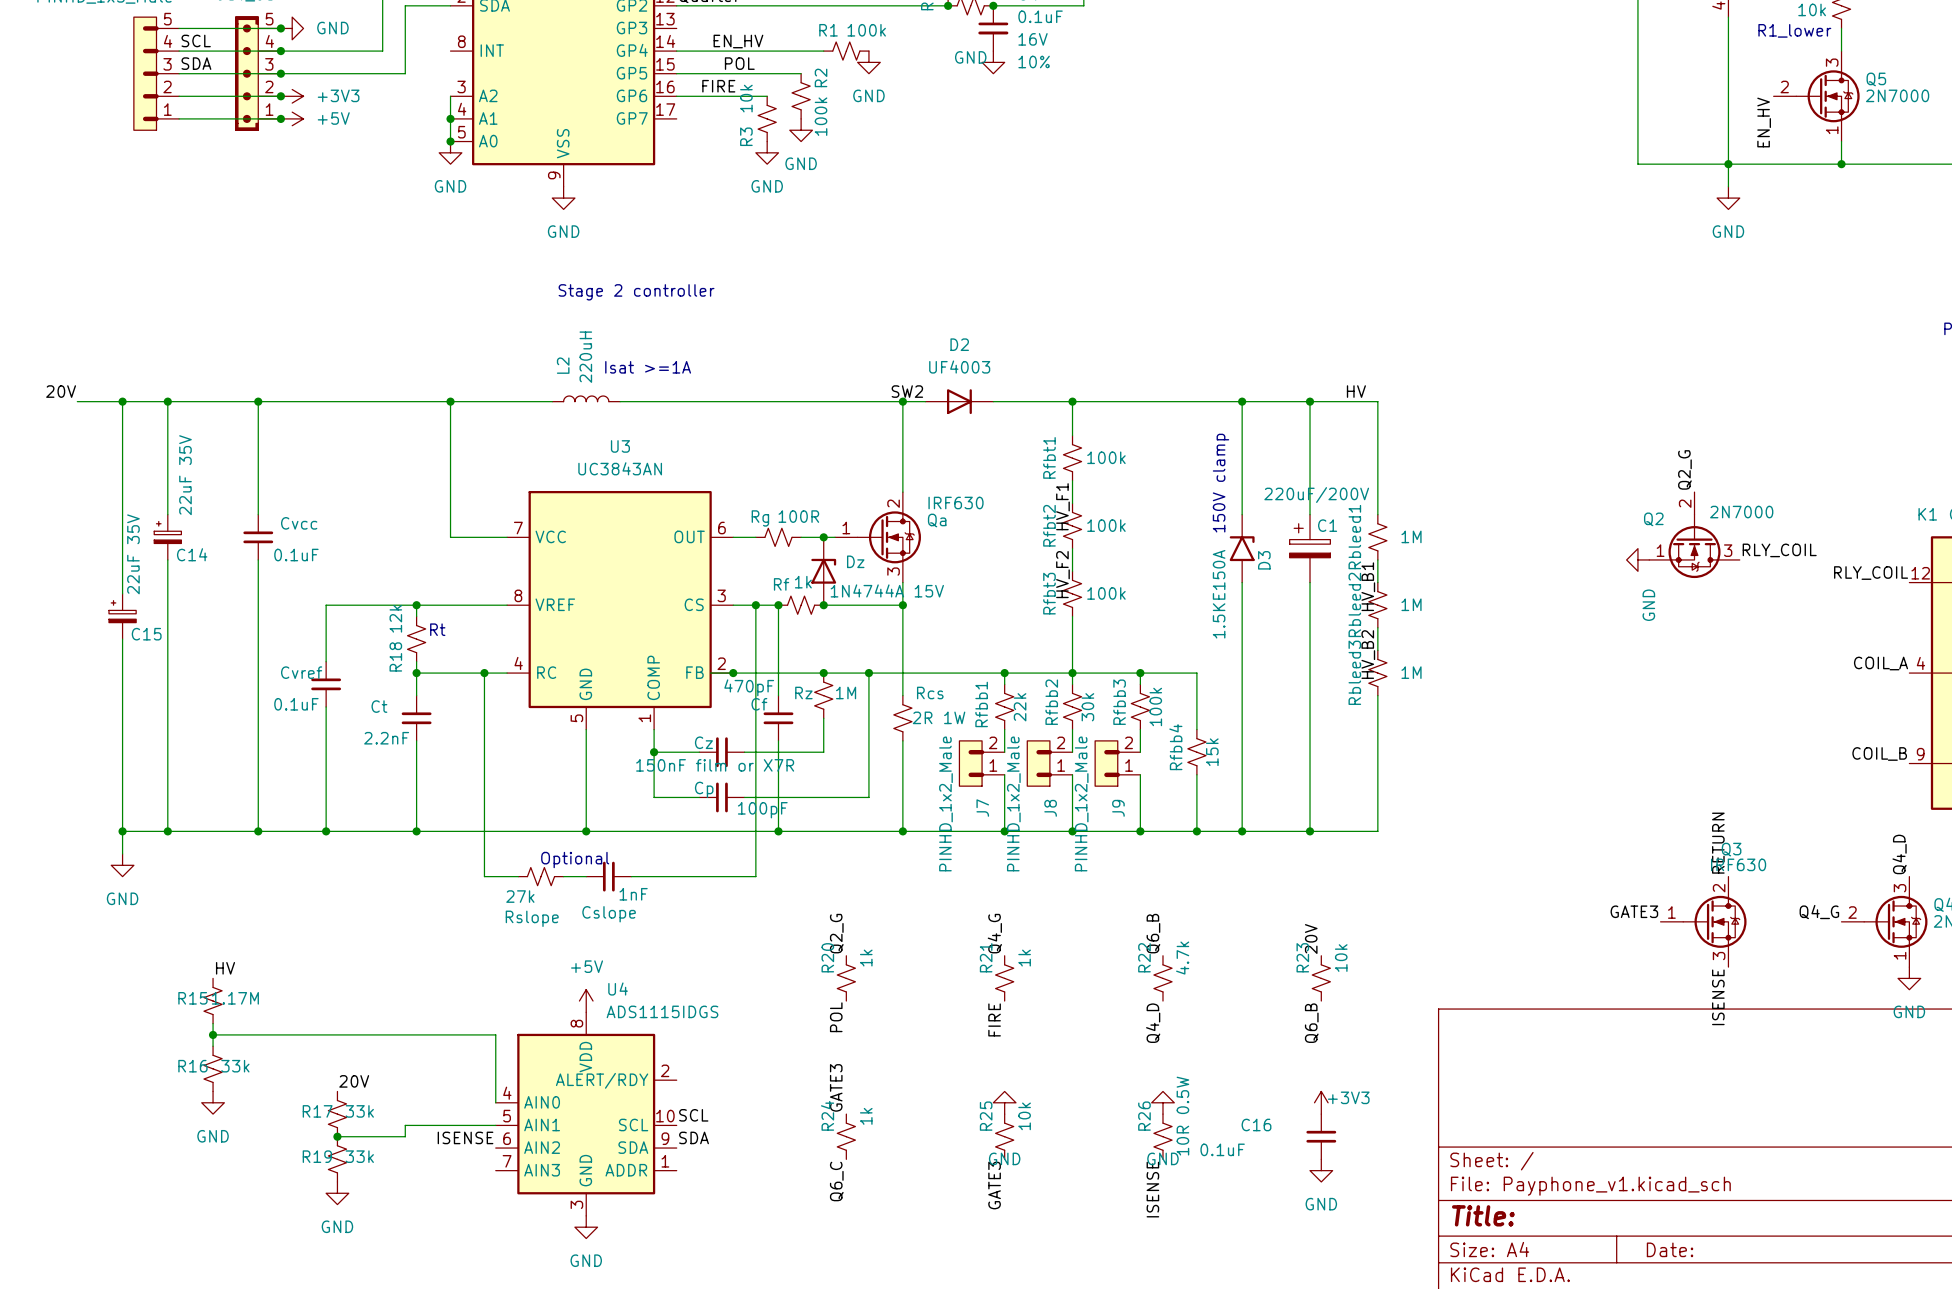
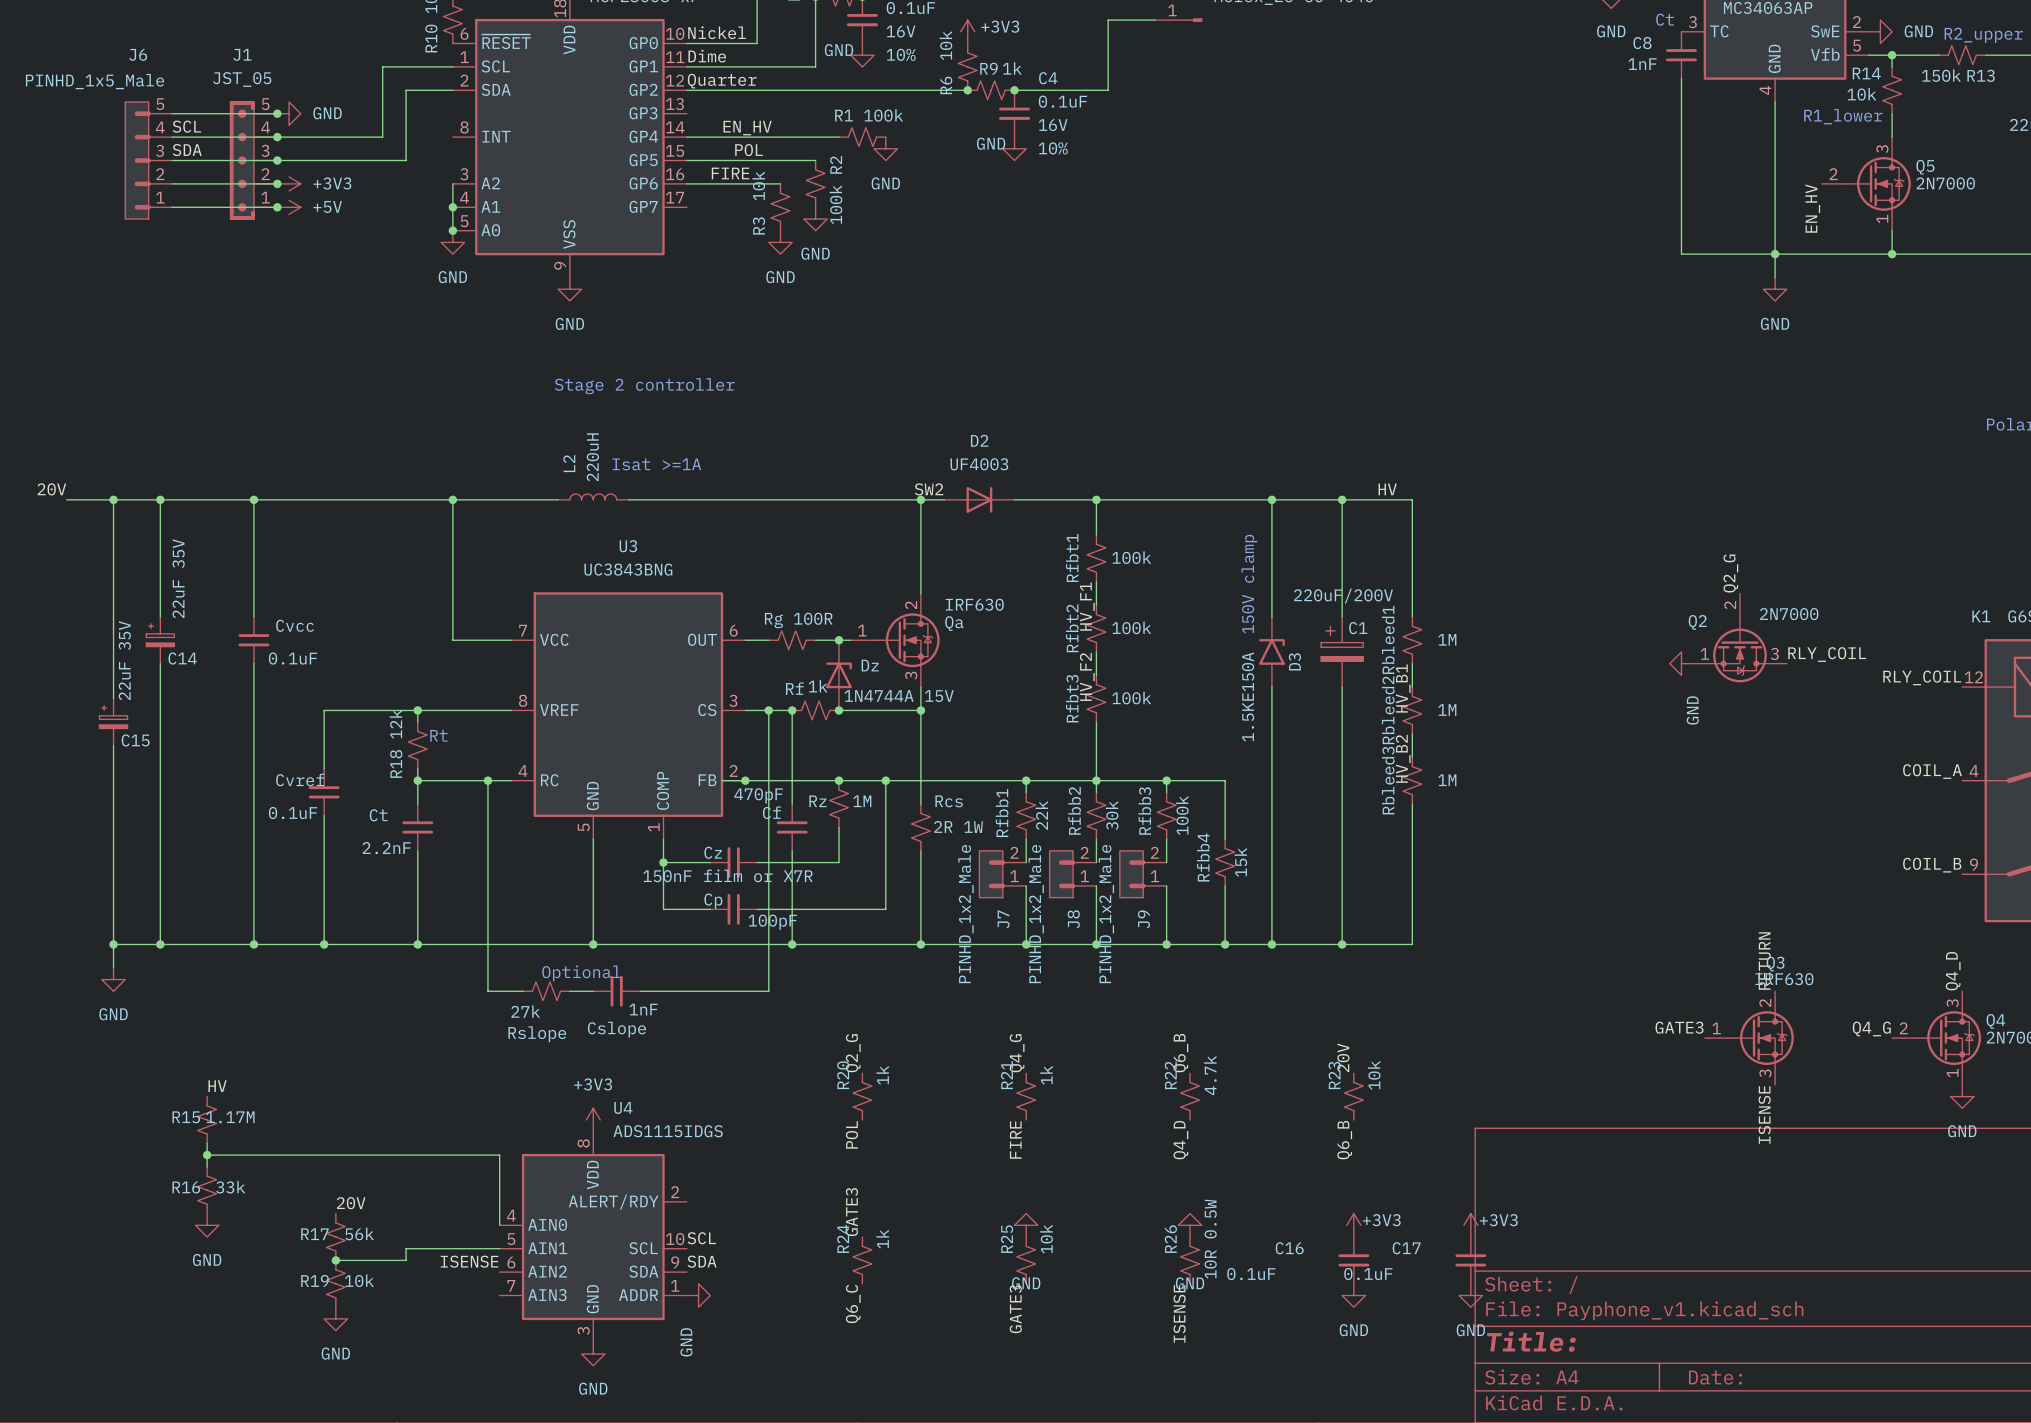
U3 value: UC3843AN (620, 468) -> UC3843BNG (628, 569)
power symbol: +5V (586, 1001) -> +3V3 (593, 1120)
power symbol: none -> +3V3 (1470, 1225)
R17 value: 33k (359, 1111) -> 56k (359, 1233)
C17: none -> 0.1uF (1470, 1260)
R19 value: 33k (359, 1156) -> 10k (359, 1280)
power symbol: none -> GND (698, 1295)
power symbol: none -> GND (1470, 1295)

